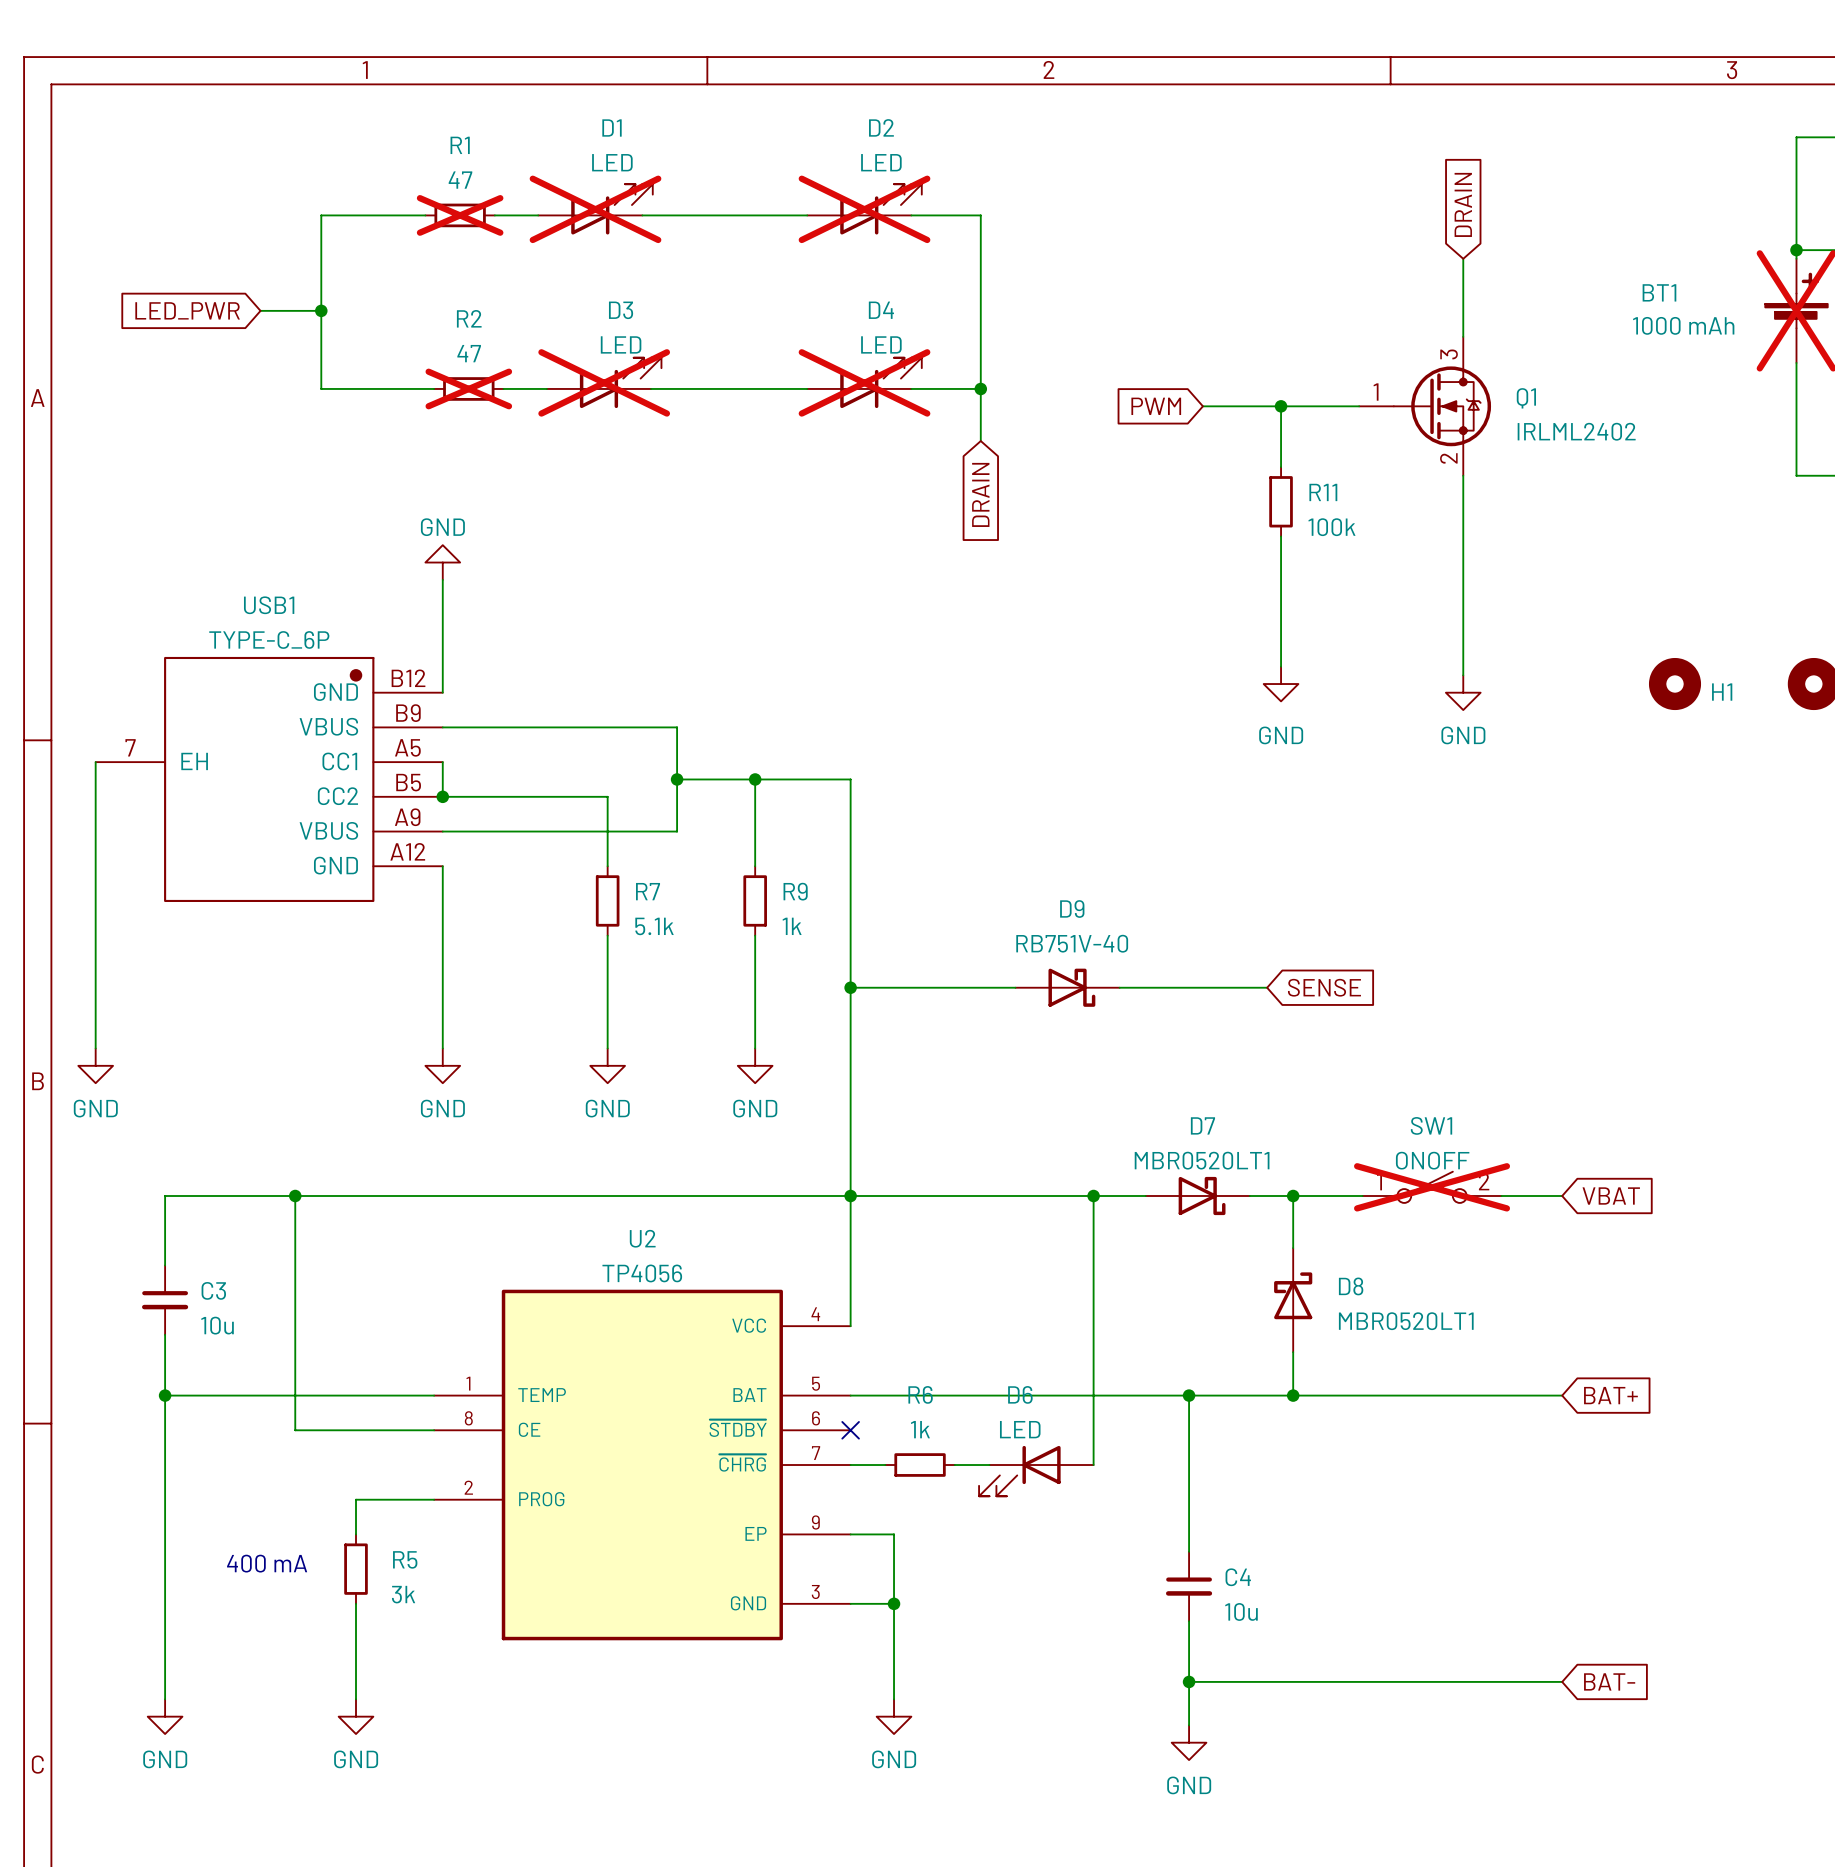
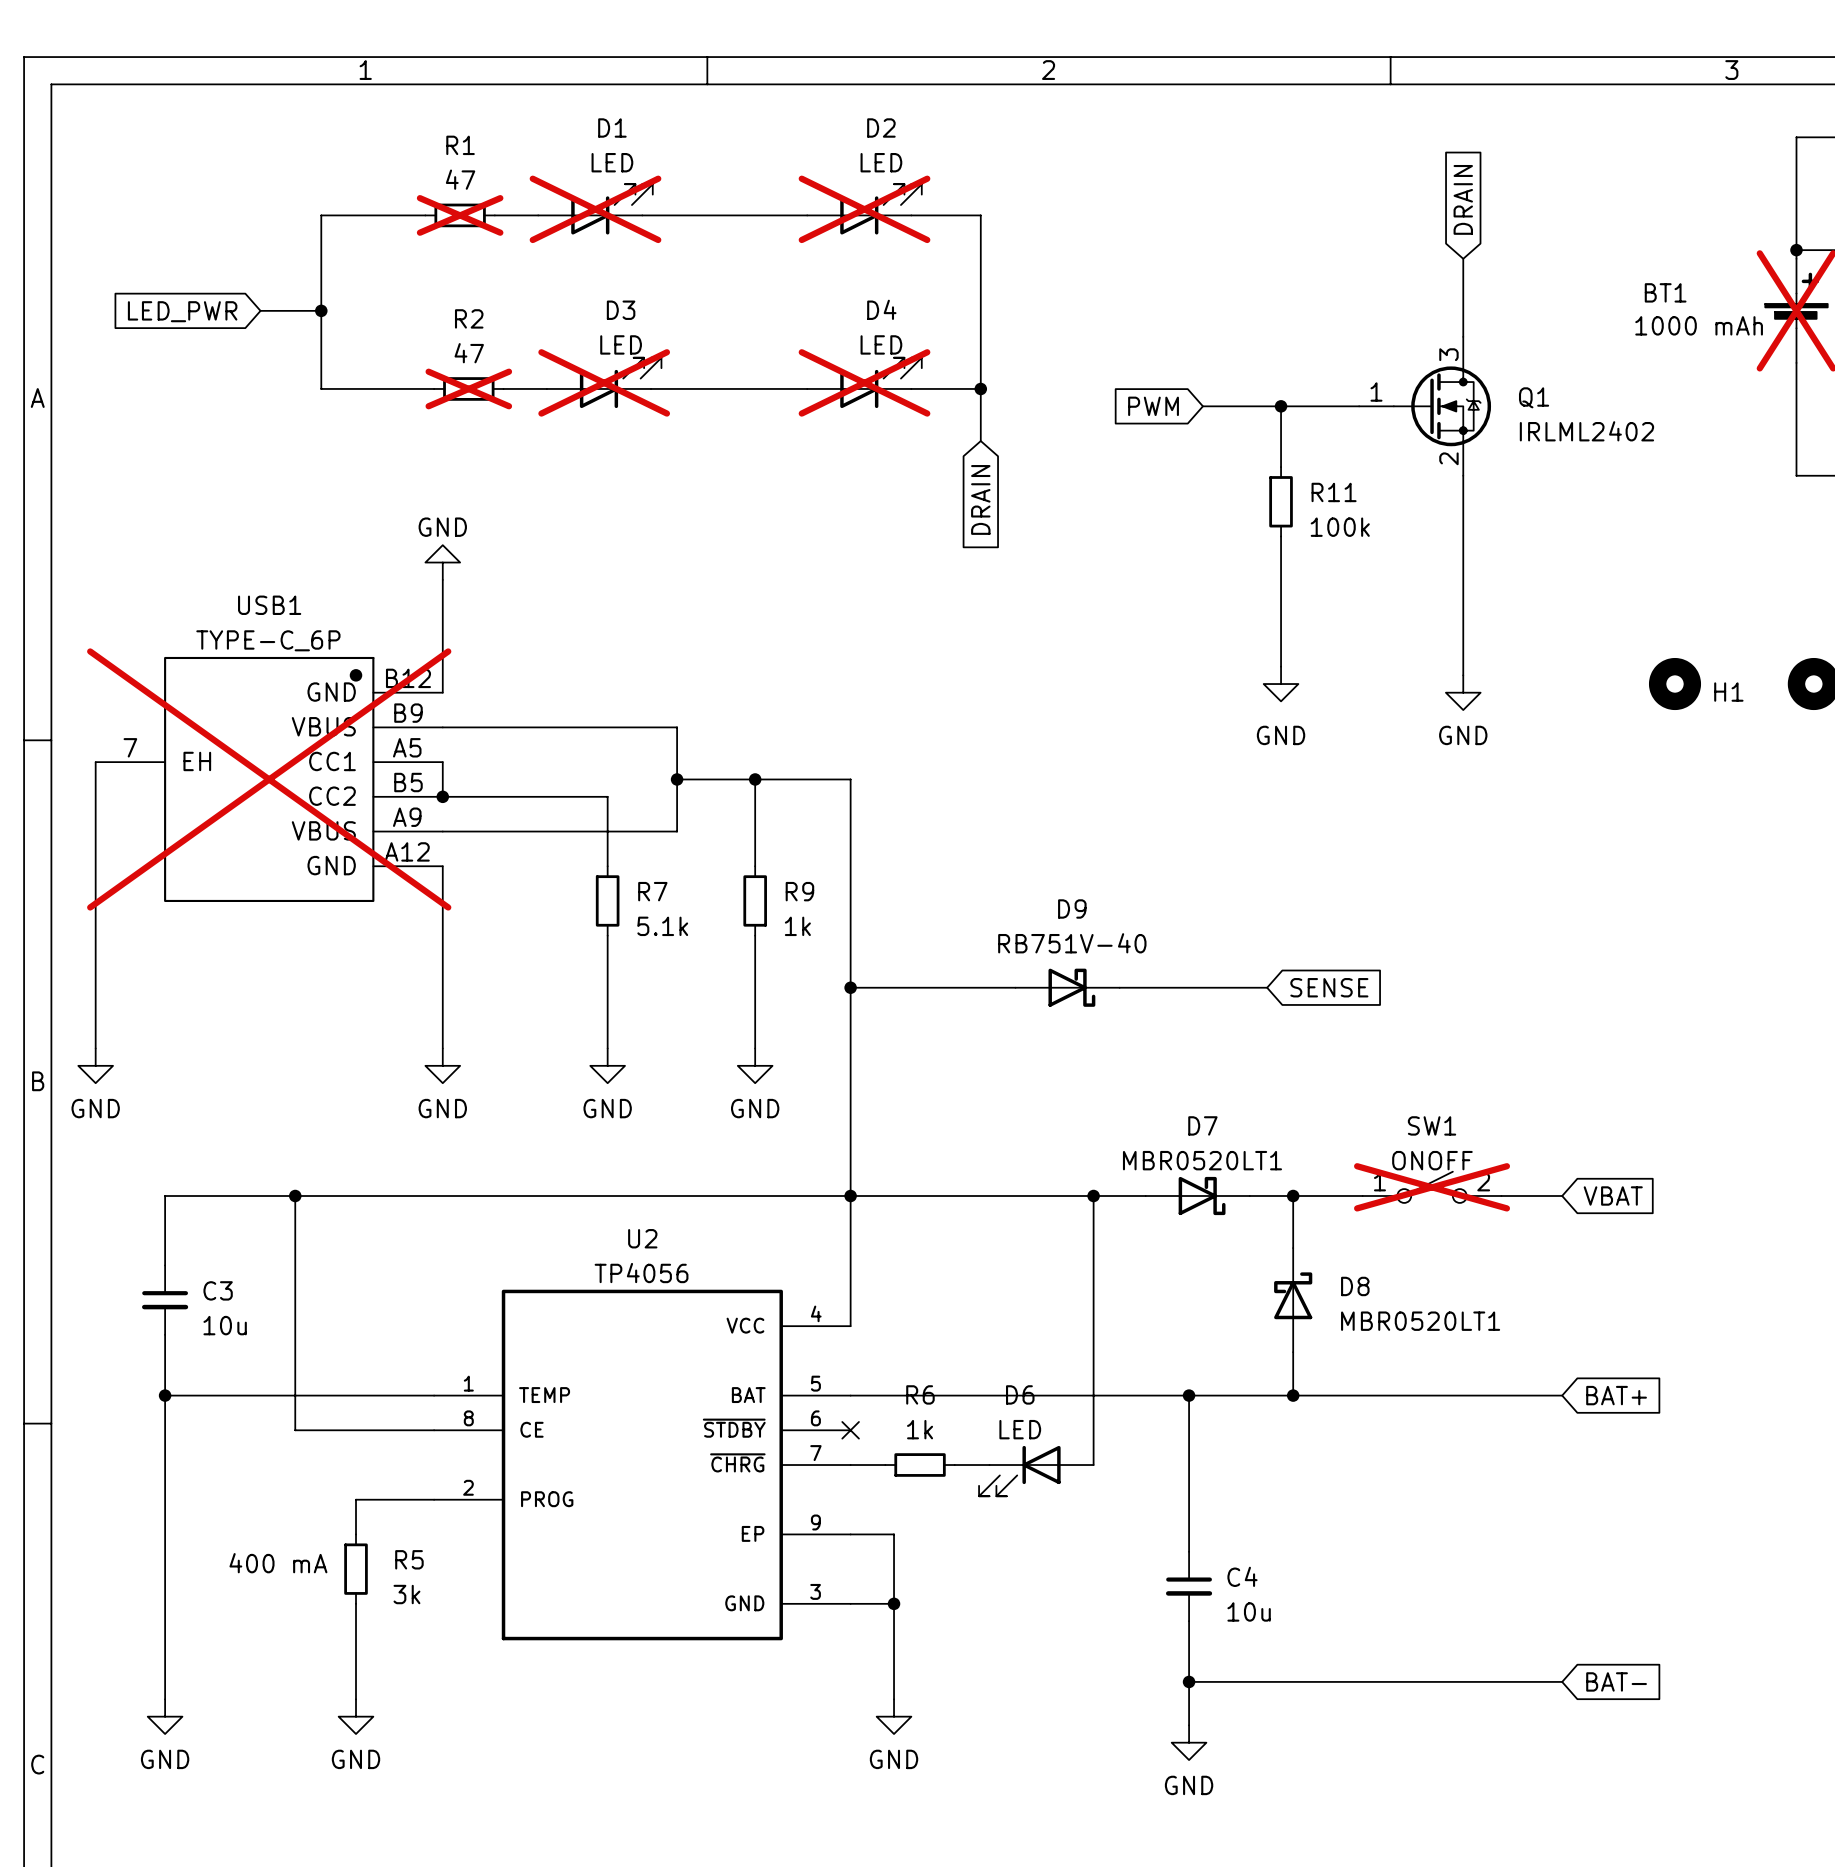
USB1 do-not-place cross: none -> (269, 779)

